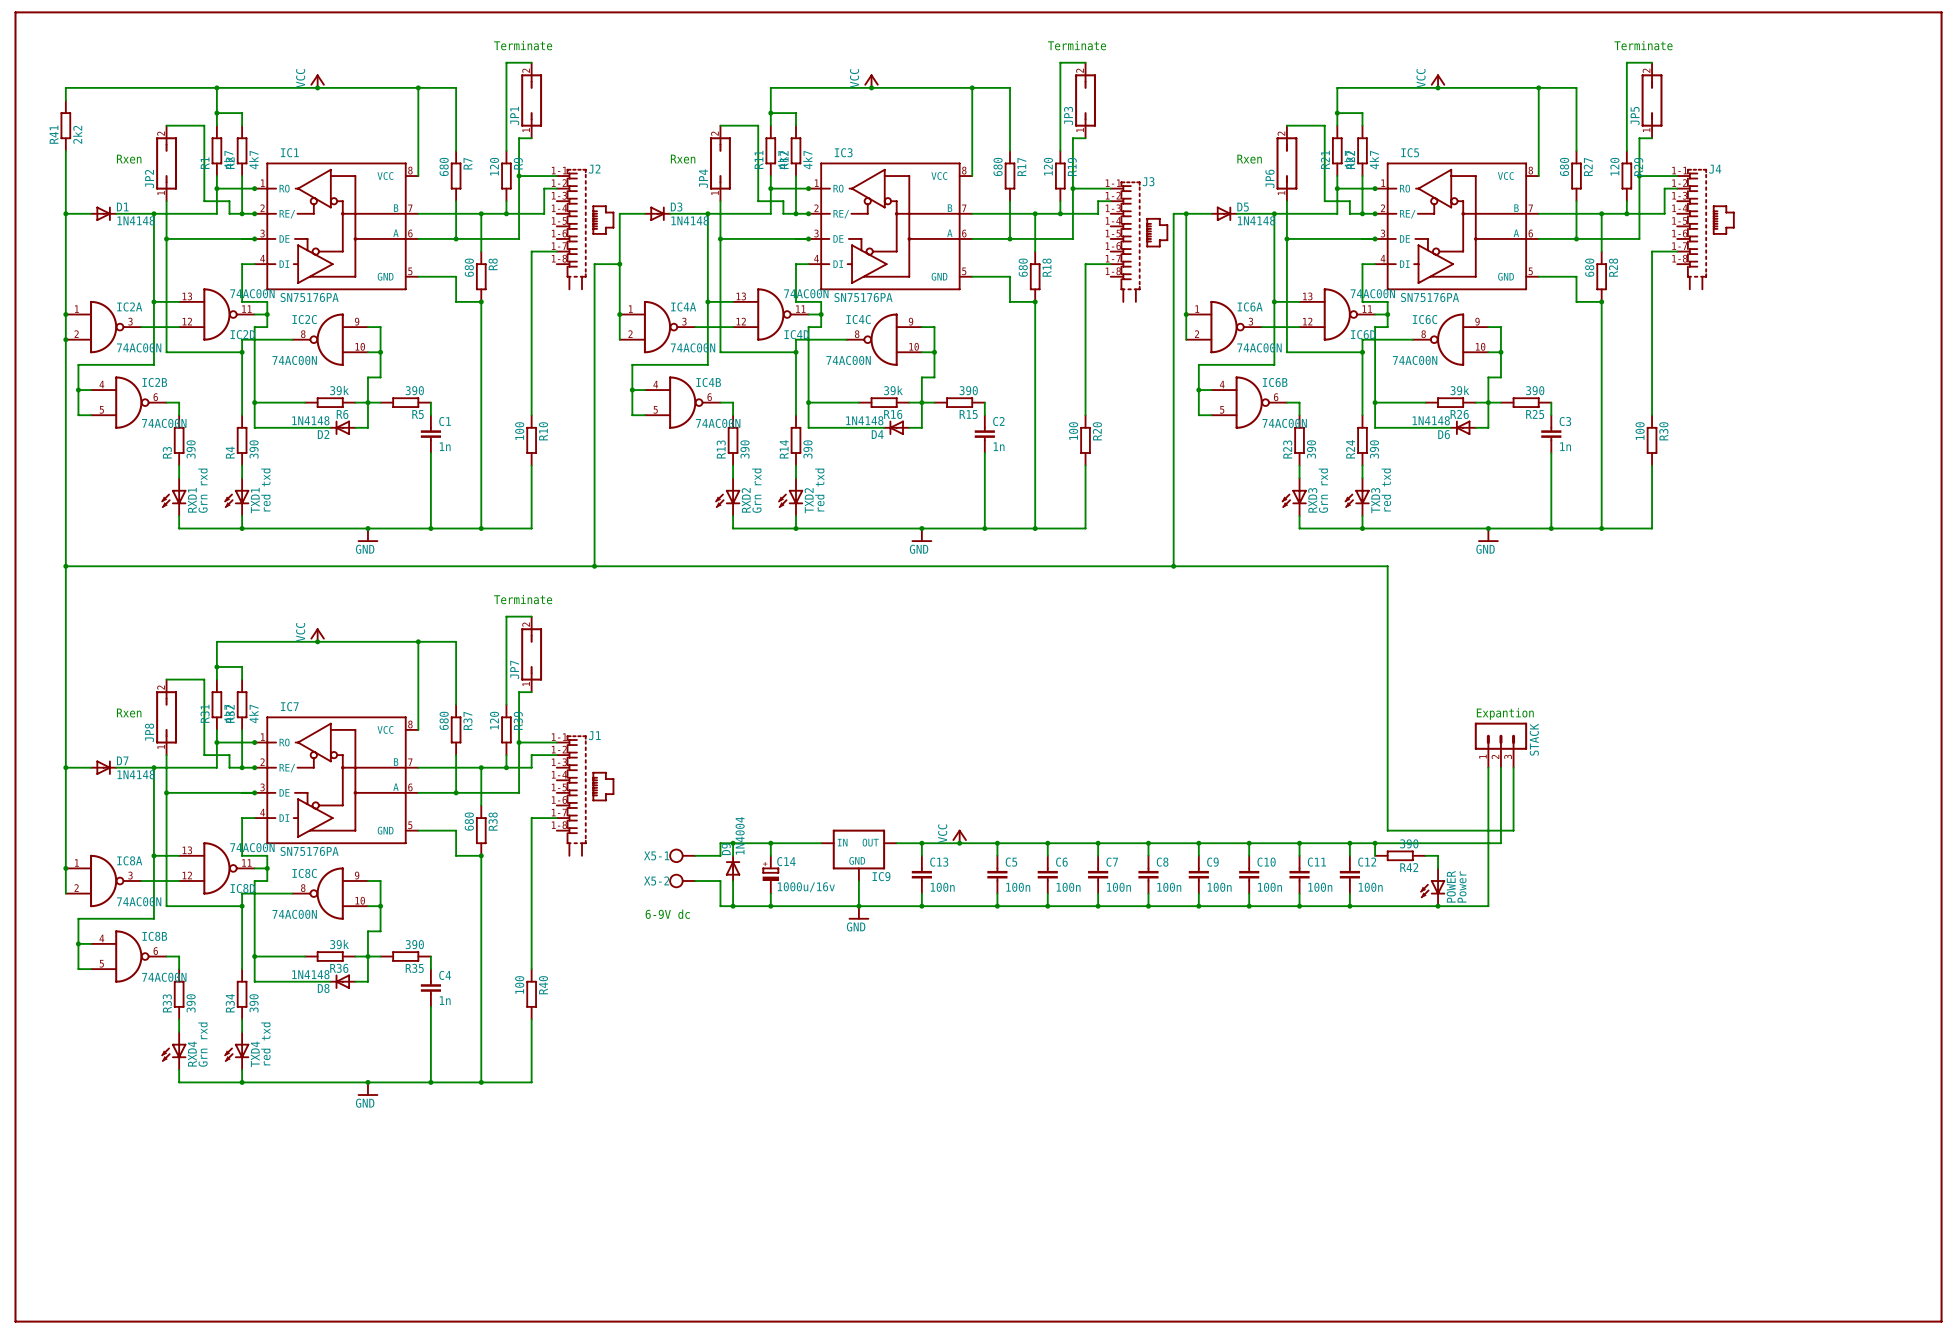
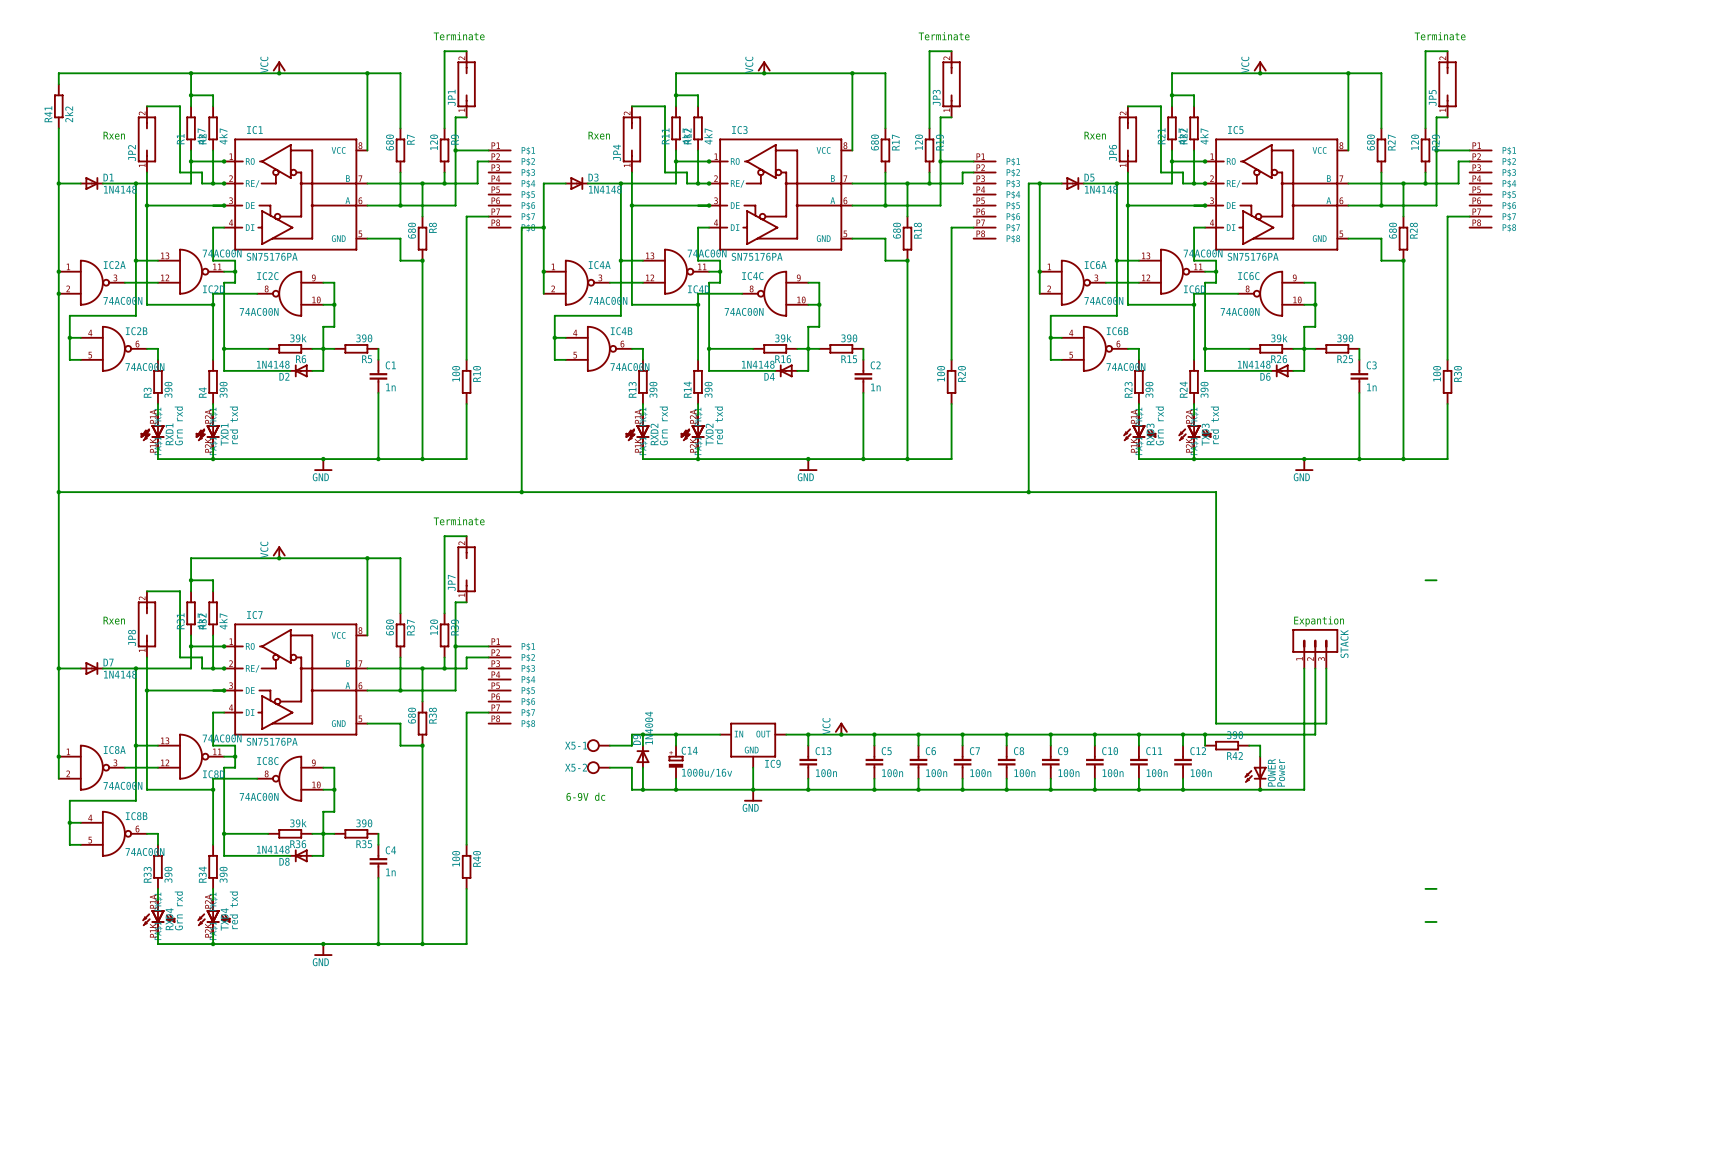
part: none -> (499, 189)
part: none -> (1480, 189)
J2: (585, 229) -> none
J4: (1705, 229) -> none
part: none -> (984, 200)
J3: (1139, 241) -> none
part: none -> (152, 431)
part: none -> (207, 431)
part: none -> (637, 431)
part: none -> (692, 431)
part: none -> (1144, 431)
part: none -> (1199, 431)
part: (978, 666) -> none
wire: none -> (1425, 580) (1436, 580)
part: none -> (499, 685)
J1: (585, 795) -> none
wire: none -> (1425, 888) (1436, 888)
part: none -> (163, 916)
part: none -> (218, 916)
wire: none -> (1425, 921) (1436, 921)

